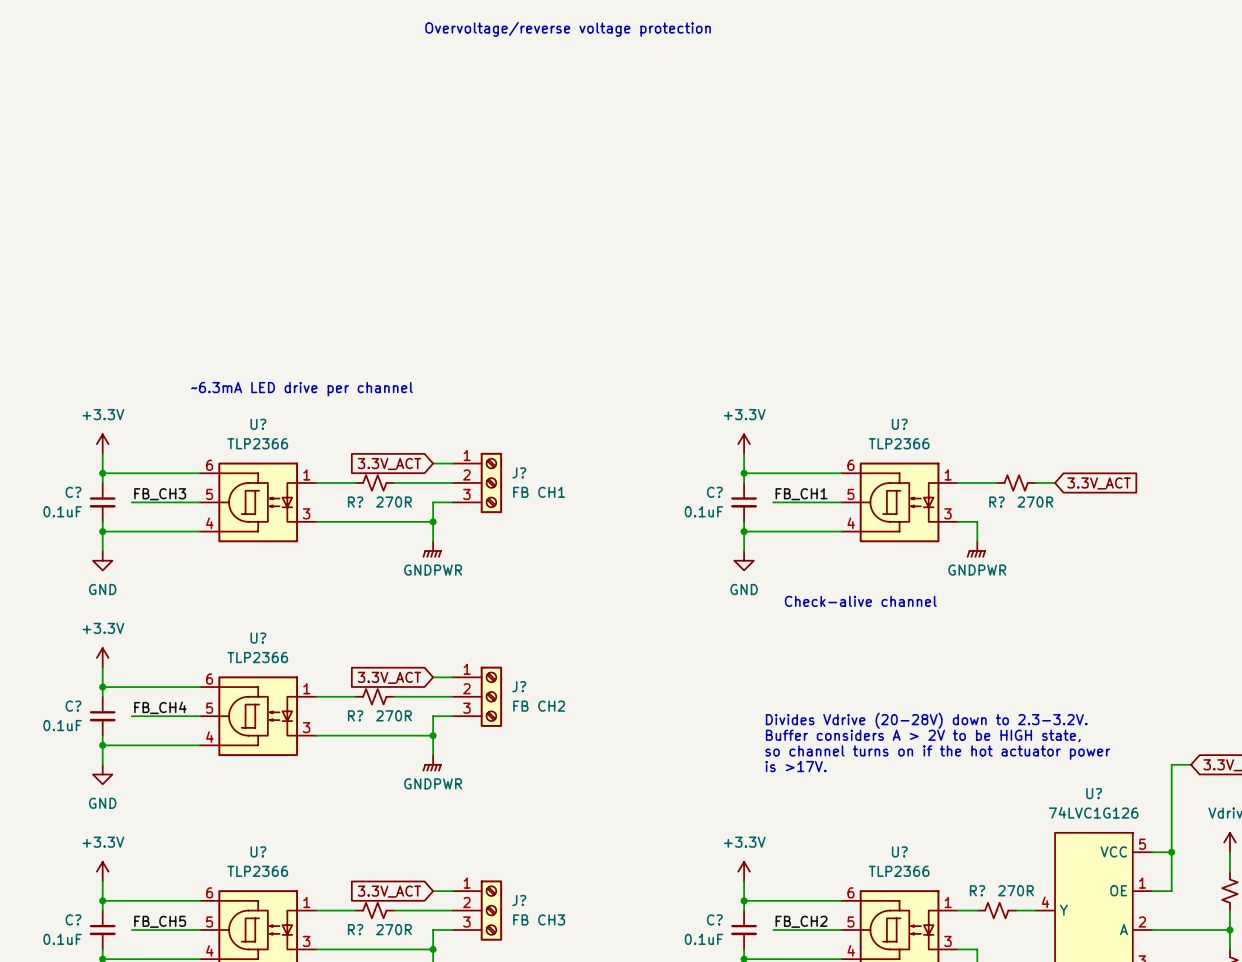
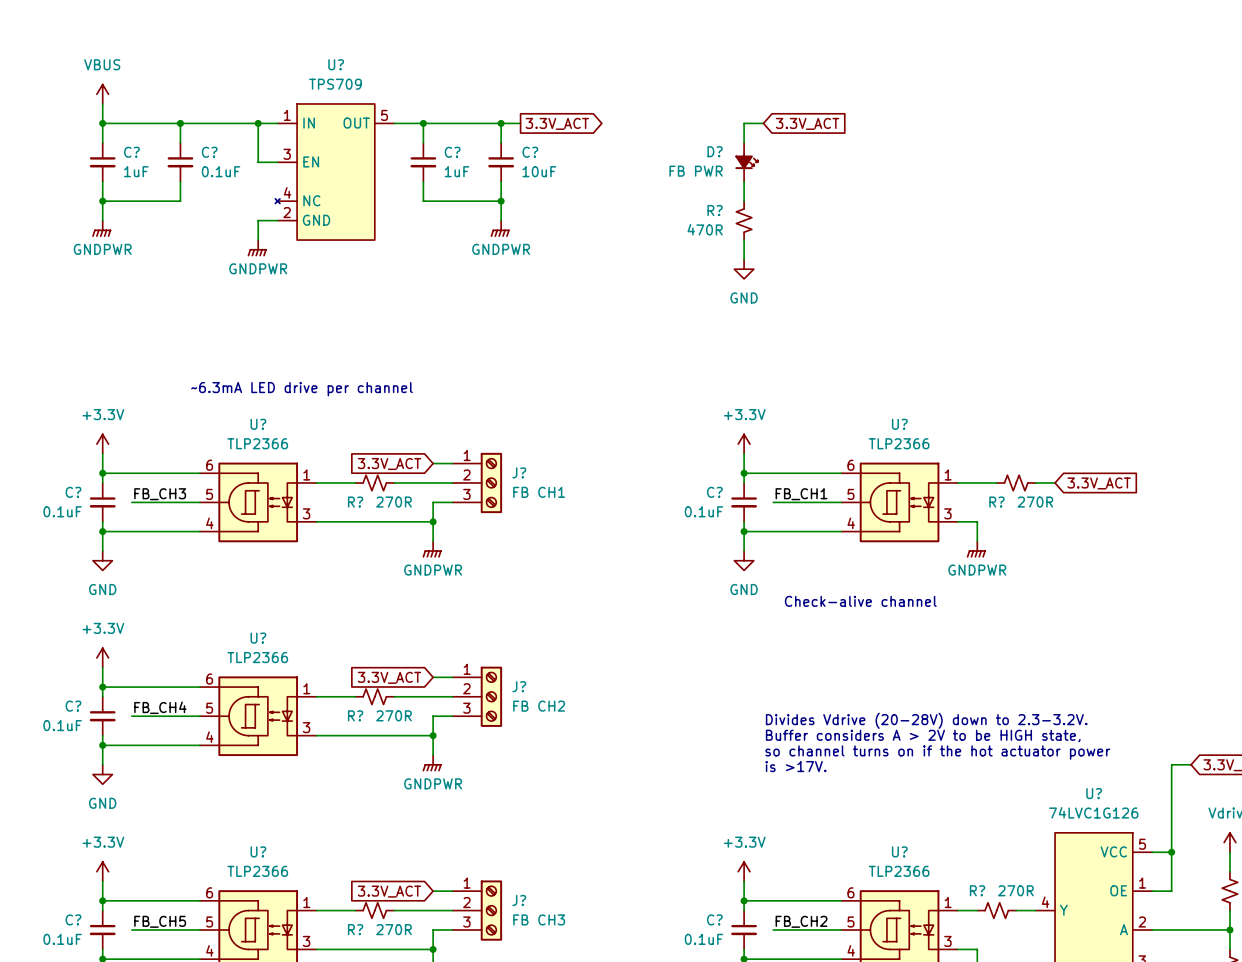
text: Overvoltage/reverse voltage protection (568, 29) -> none
power symbol: none -> VBUS (102, 94)
wire: none -> (102, 103) (102, 142)
wire: none -> (102, 123) (277, 123)
junction: none -> (102, 123)
wire: none -> (180, 123) (180, 142)
junction: none -> (180, 123)
wire: none -> (258, 123) (258, 162) (277, 162)
junction: none -> (258, 123)
wire: none -> (394, 123) (520, 123)
wire: none -> (423, 123) (423, 142)
junction: none -> (423, 123)
wire: none -> (501, 123) (501, 142)
junction: none -> (501, 123)
global label: none -> 3.3V_ACT (557, 123)
wire: none -> (763, 123) (744, 123) (744, 142)
global label: none -> 3.3V_ACT (807, 123)
C?: none -> 1uF (102, 162)
C?: none -> 0.1uF (180, 162)
C?: none -> 1uF (423, 162)
C?: none -> 10uF (501, 162)
D?: none -> FB PWR (746, 162)
U?: none -> TPS709 (334, 172)
wire: none -> (102, 181) (102, 220)
wire: none -> (180, 181) (180, 201) (102, 201)
wire: none -> (423, 181) (423, 201) (501, 201)
wire: none -> (501, 181) (501, 220)
wire: none -> (744, 181) (744, 201)
junction: none -> (102, 201)
junction: none -> (501, 201)
wire: none -> (277, 220) (258, 220) (258, 240)
R?: none -> 470R (744, 220)
power symbol: none -> GNDPWR (101, 228)
power symbol: none -> GNDPWR (500, 228)
wire: none -> (744, 240) (744, 259)
power symbol: none -> GNDPWR (257, 248)
power symbol: none -> GND (744, 269)

